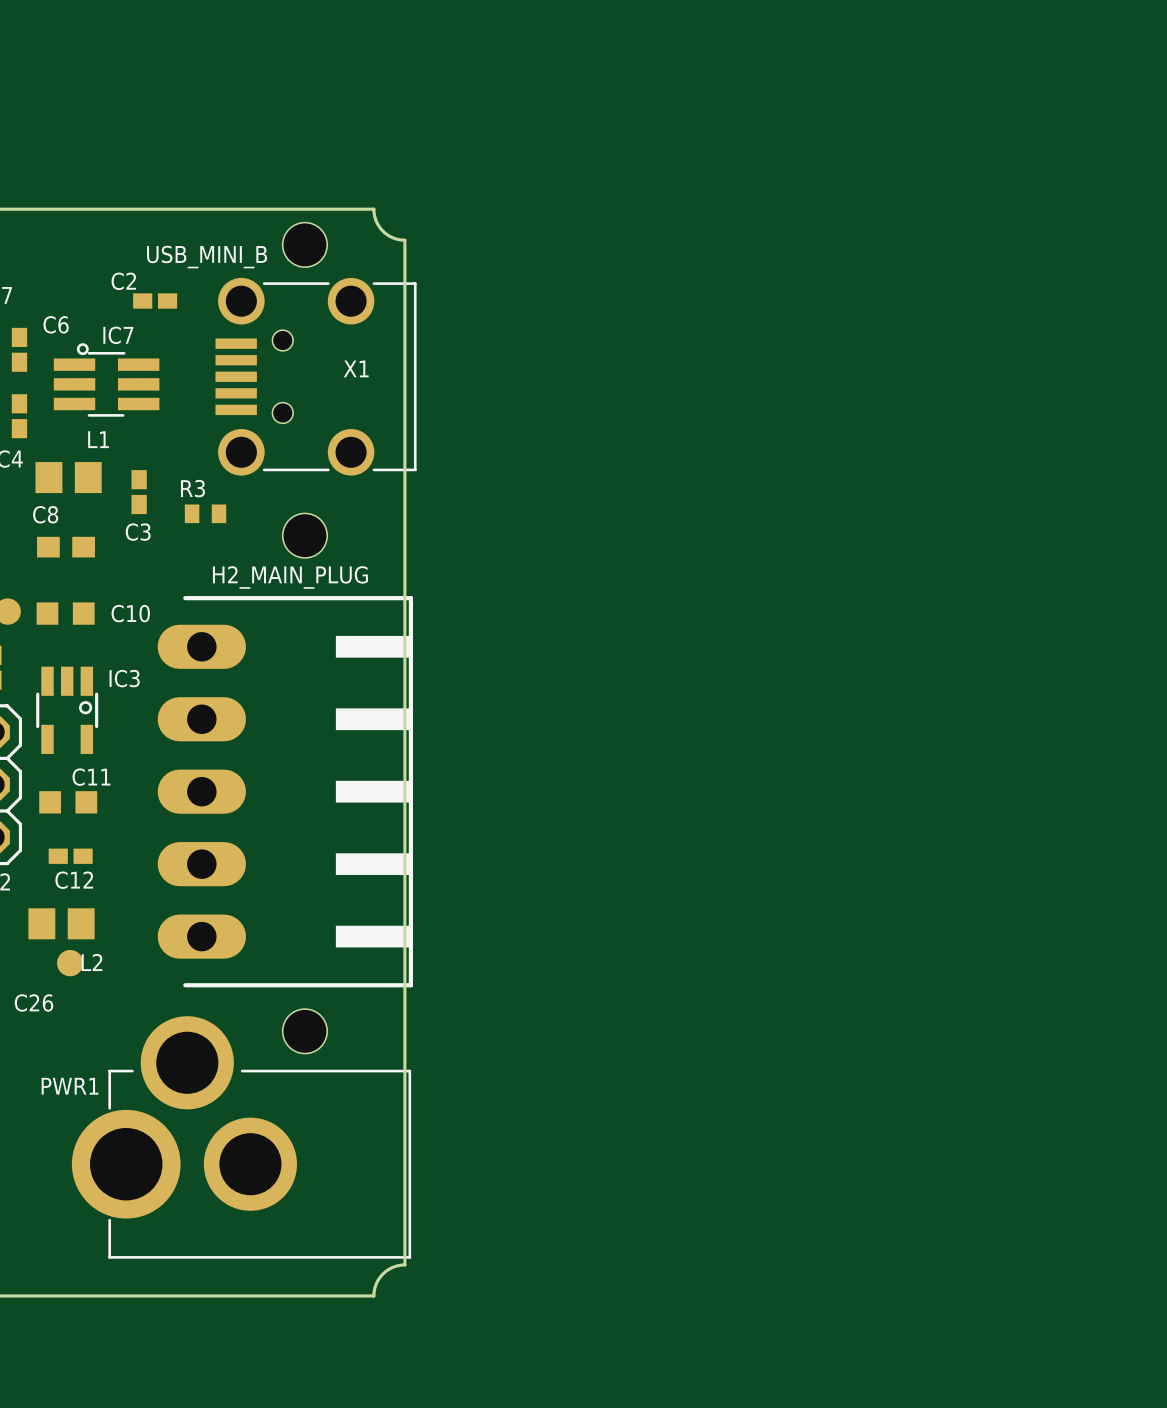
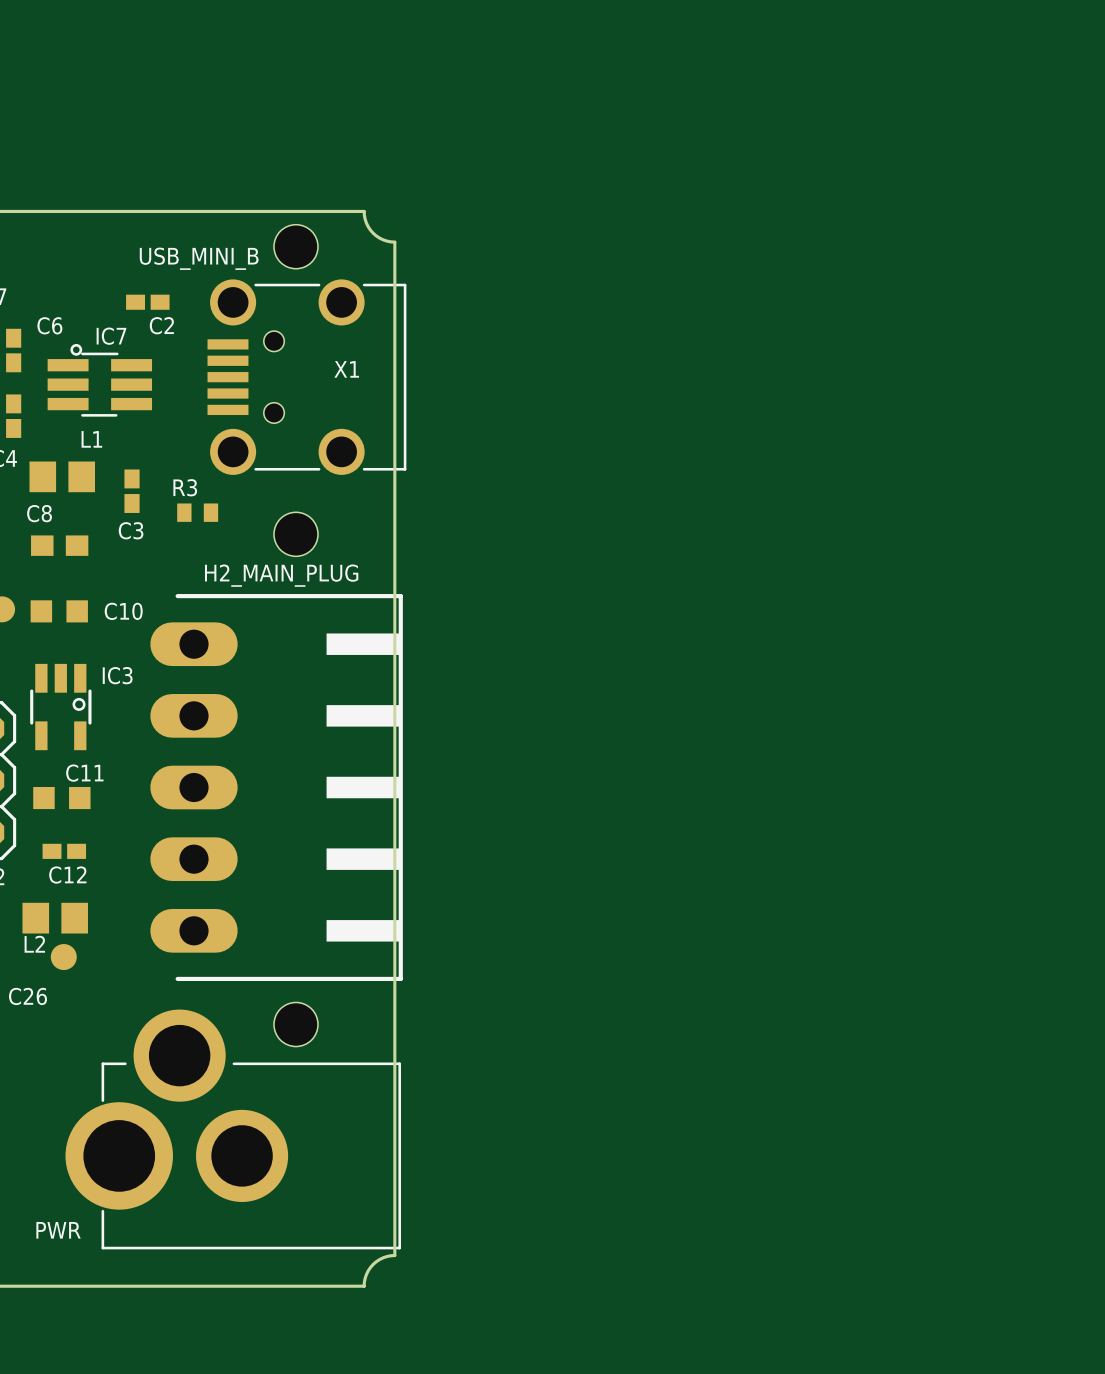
C2 name position: C2 (123, 281) -> C2 (161, 325)
L2 name position: L2 (92, 962) -> L2 (34, 944)
PWR1 name: PWR1 (70, 1086) -> PWR (58, 1230)

